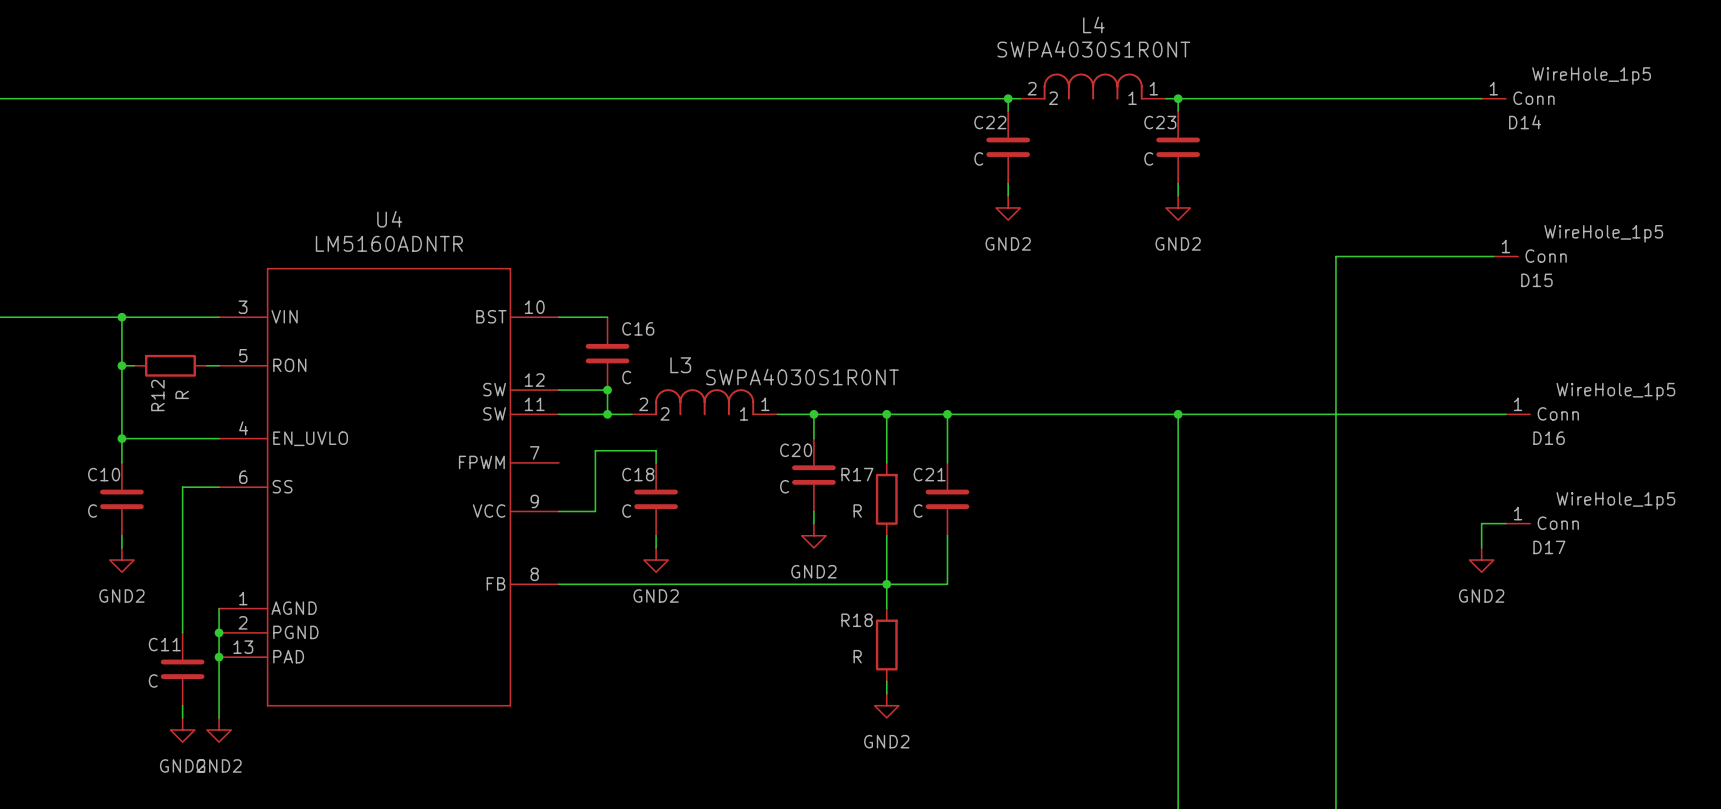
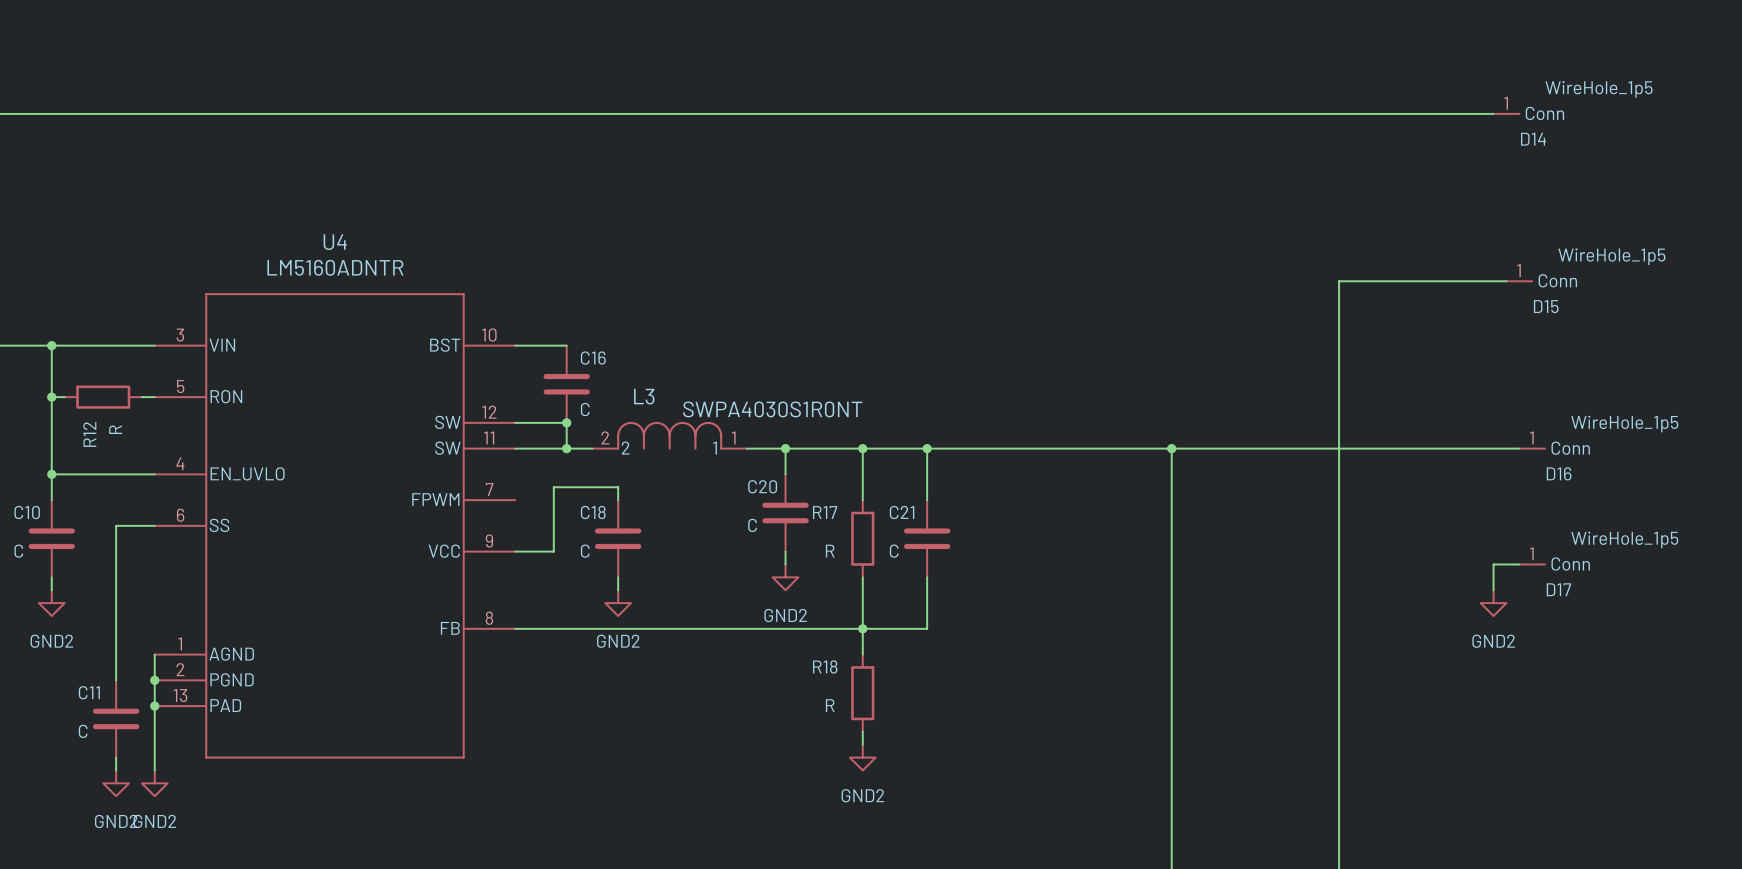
L4: SWPA4030S1R0NT (1093, 86) -> none
wire: (1008, 98) (1008, 110) -> none
junction: (1008, 98) -> none
wire: none -> (1004, 113) (1158, 113)
wire: (1178, 98) (1178, 110) -> none
junction: (1178, 98) -> none
C22: C (1008, 147) -> none
C23: C (1178, 147) -> none
wire: (1008, 183) (1008, 195) -> none
wire: (1178, 183) (1178, 195) -> none
power symbol: GND2 (1008, 207) -> none
power symbol: GND2 (1178, 207) -> none

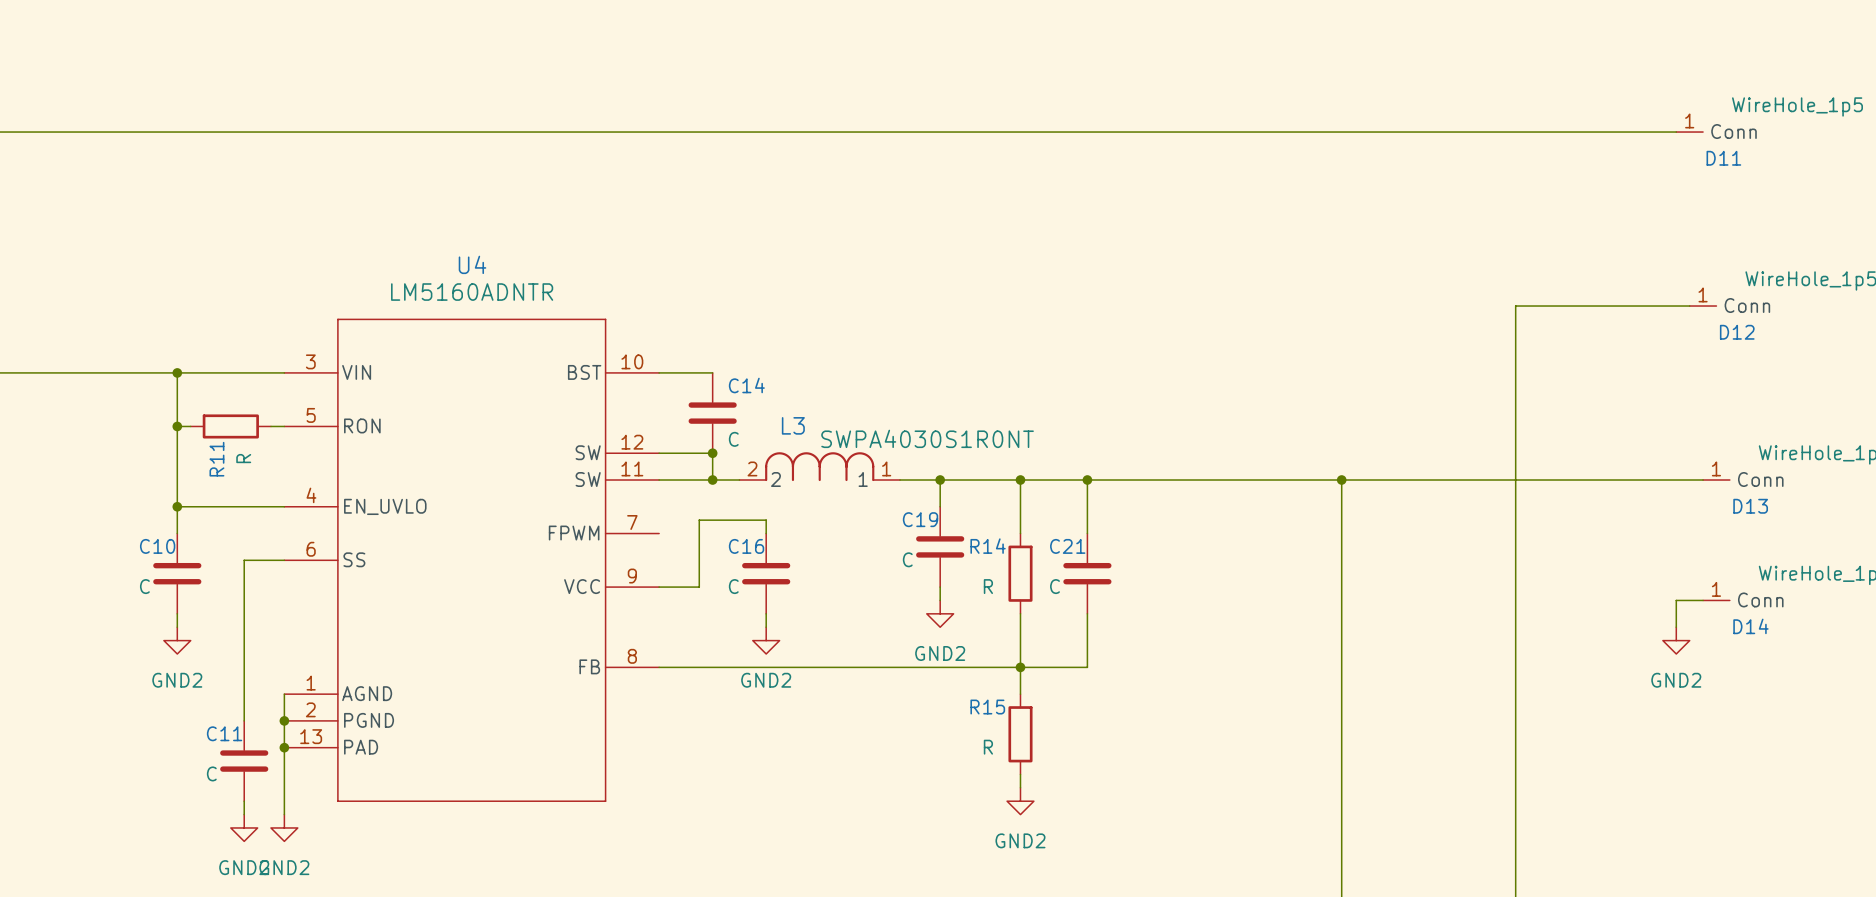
D14 name: D14 (1533, 139) -> D11 (1723, 158)
D15 name: D15 (1546, 306) -> D12 (1737, 332)
C16 name: C16 (593, 358) -> C14 (746, 385)
R12 name: R12 (89, 434) -> R11 (216, 459)
D16 name: D16 (1559, 473) -> D13 (1750, 506)
C20 name: C20 (762, 486) -> C19 (920, 519)
C18 name: C18 (593, 512) -> C16 (746, 546)
R17 name: R17 (825, 512) -> R14 (988, 546)
D17 name: D17 (1558, 589) -> D14 (1750, 626)
R18 name: R18 (825, 666) -> R15 (987, 707)

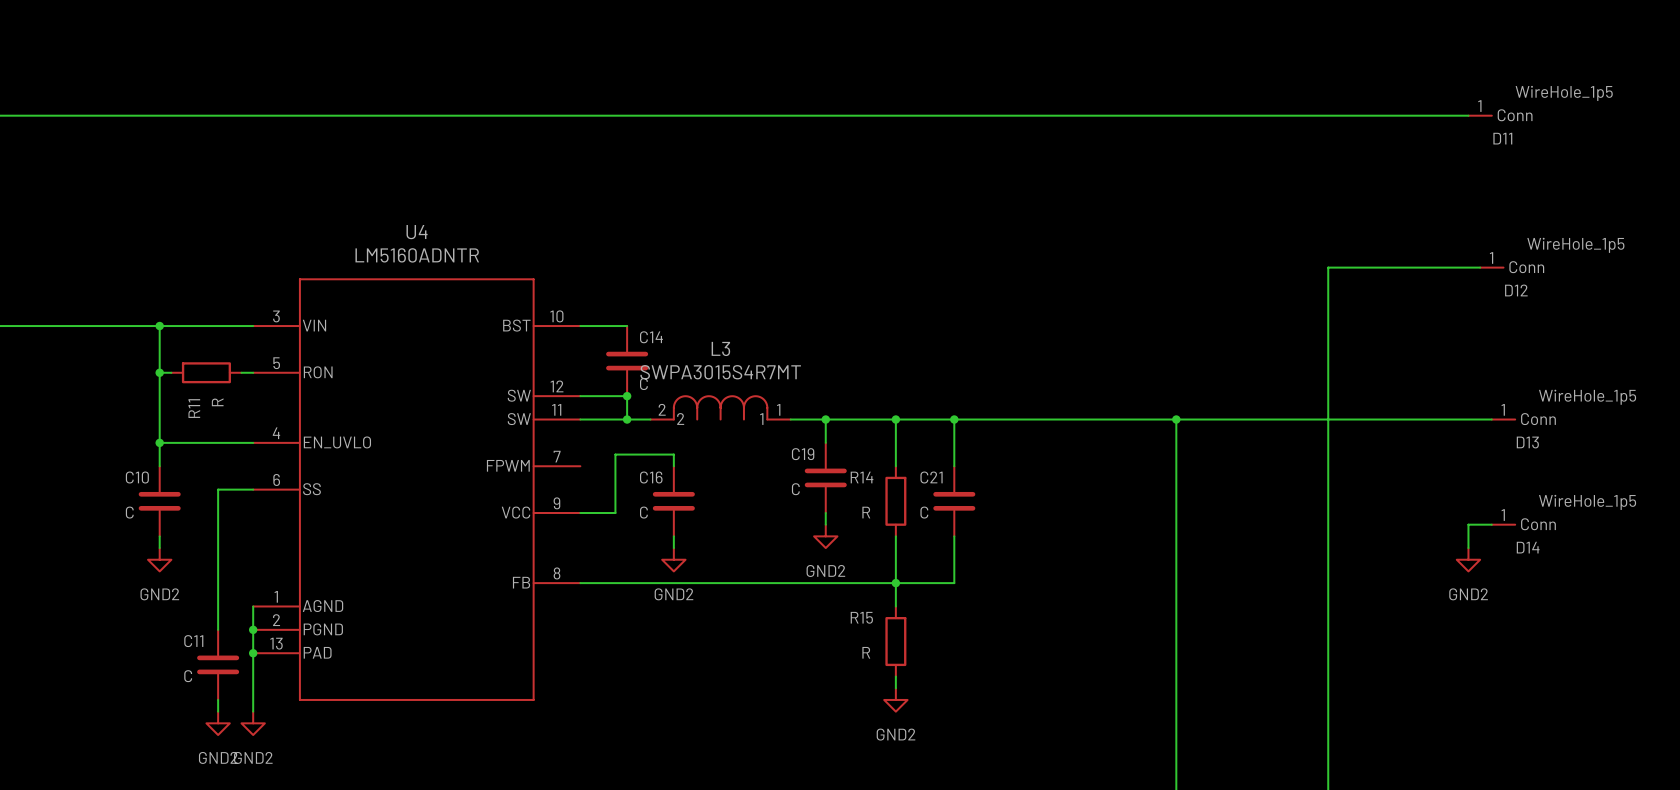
L3 name position: L3 (793, 425) -> L3 (720, 348)
L3 value: SWPA4030S1R0NT (927, 438) -> SWPA3015S4R7MT (720, 372)

